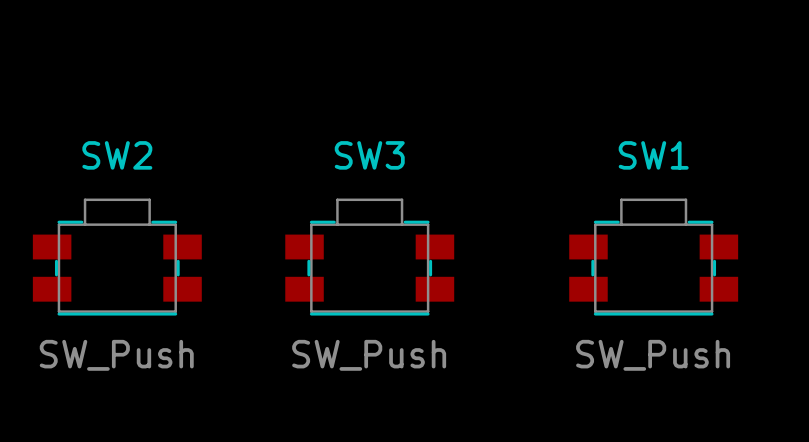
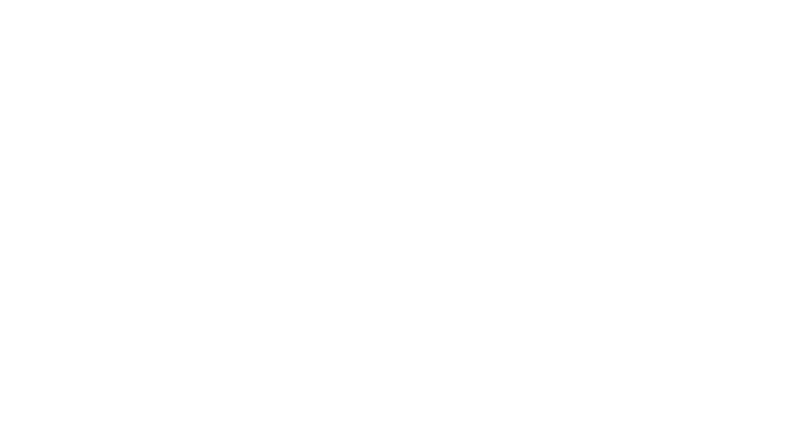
SW2: SW_Push (117, 257) -> none
SW3: SW_Push (369, 257) -> none
SW1: SW_Push (653, 257) -> none

